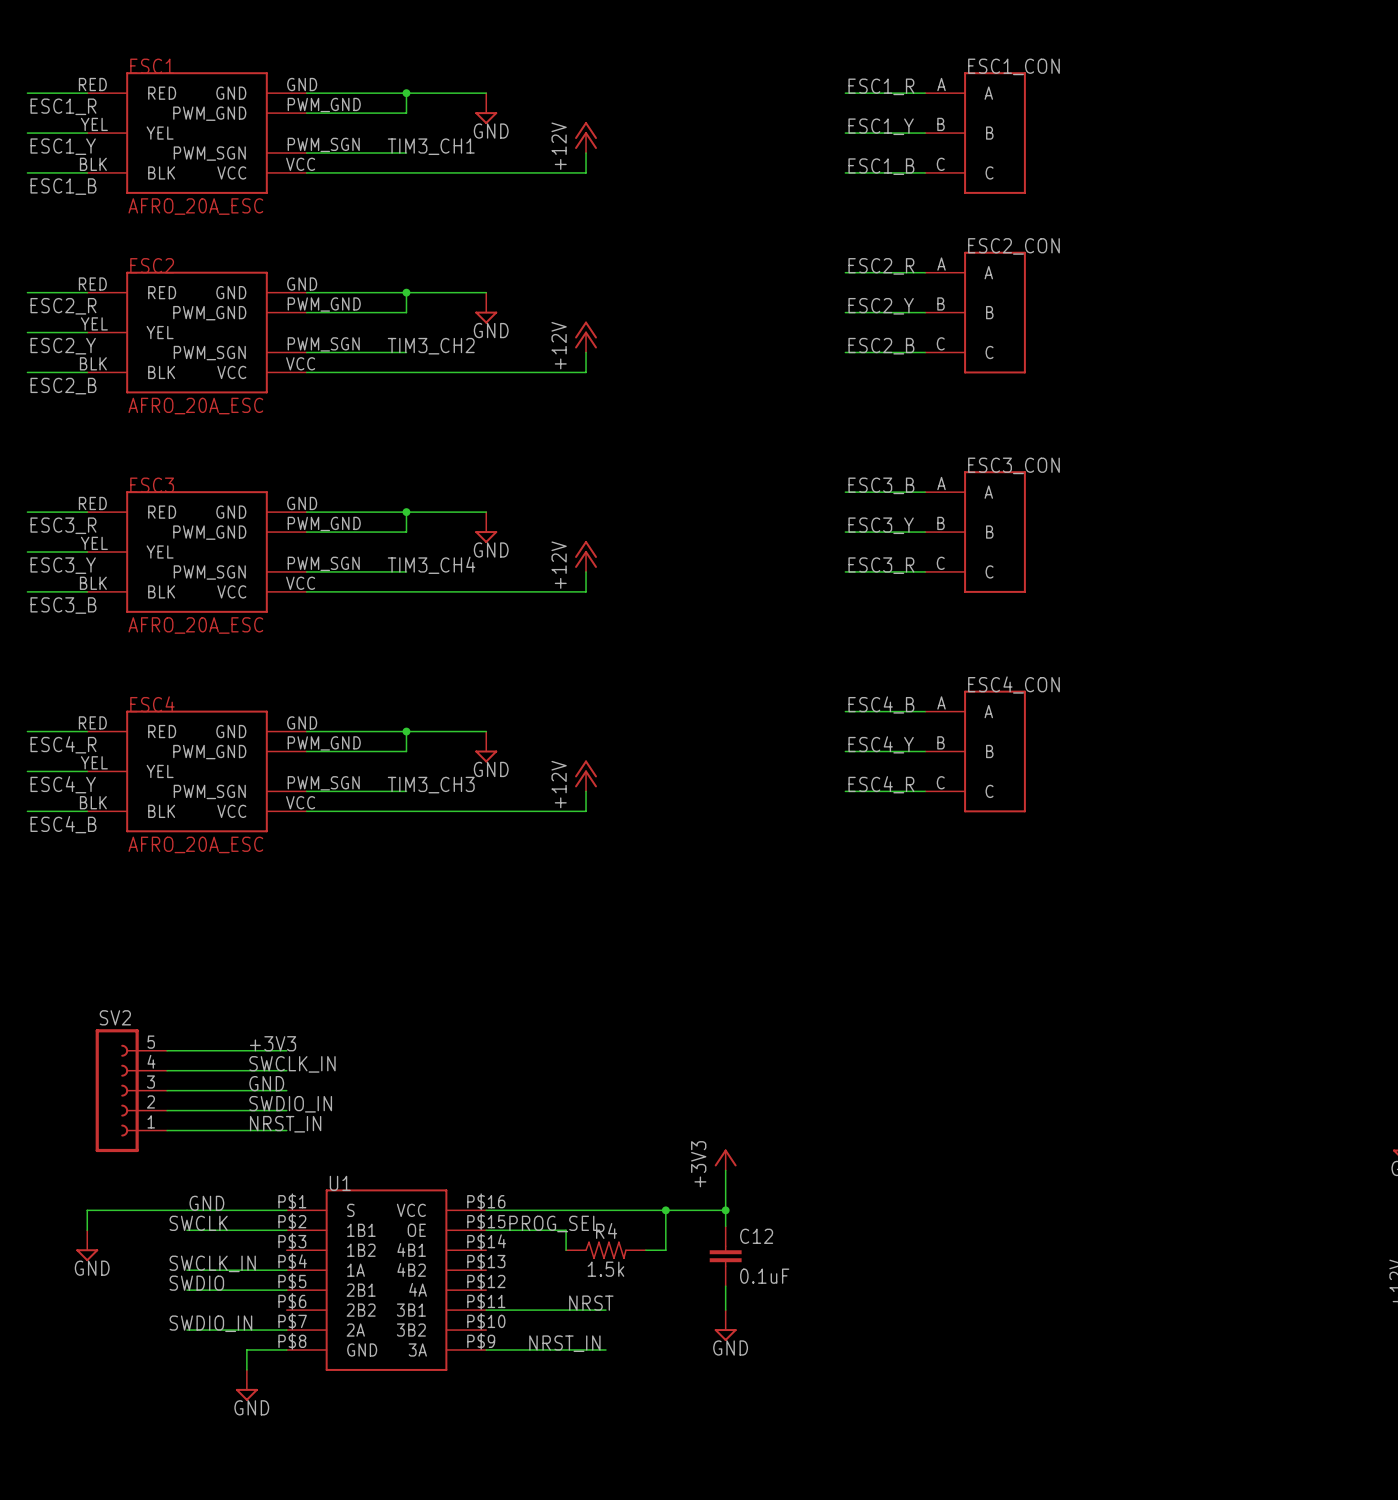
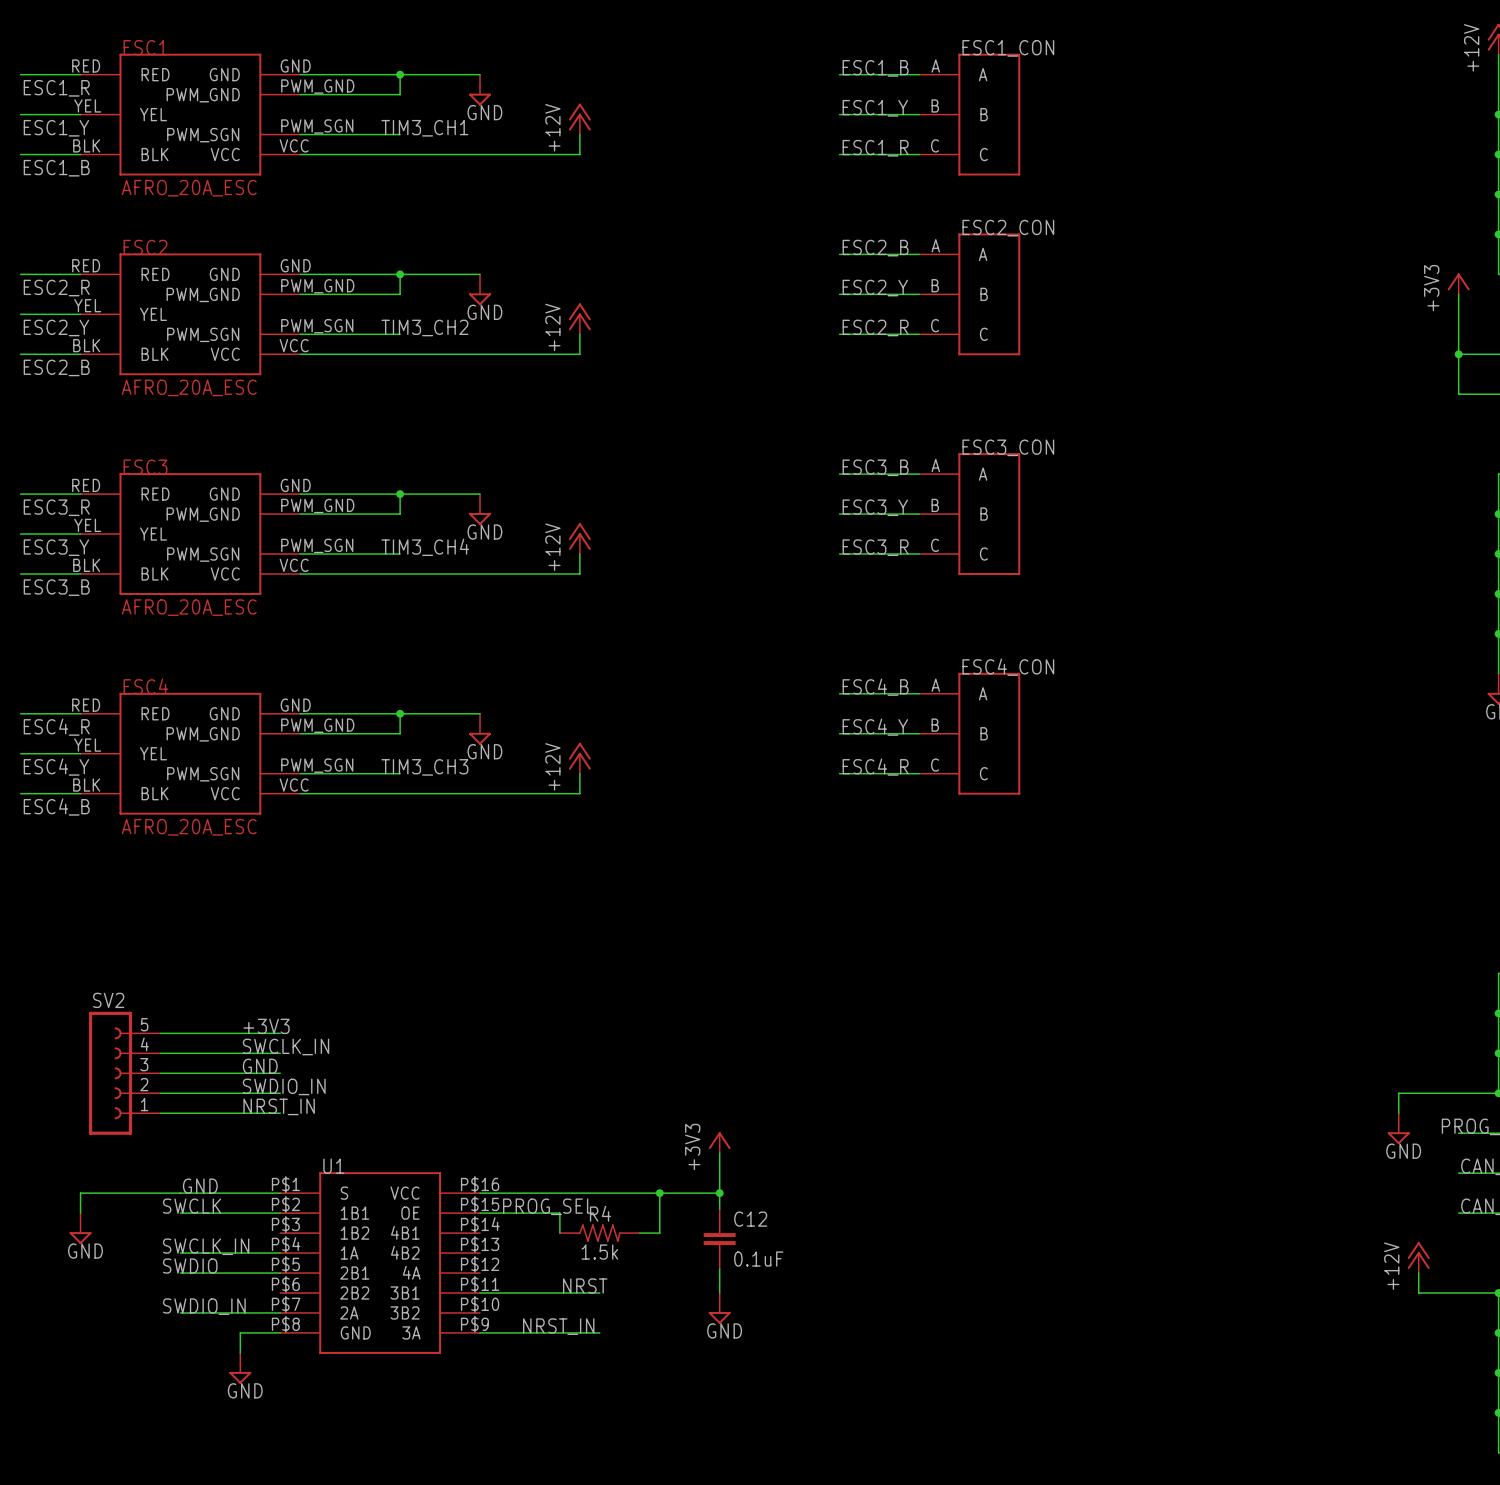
label: ESC1_R (881, 86) -> ESC1_B (875, 68)
label: ESC1_B (881, 166) -> ESC1_R (875, 148)
label: ESC2_R (881, 266) -> ESC2_B (875, 248)
label: ESC2_B (881, 346) -> ESC2_R (875, 327)

